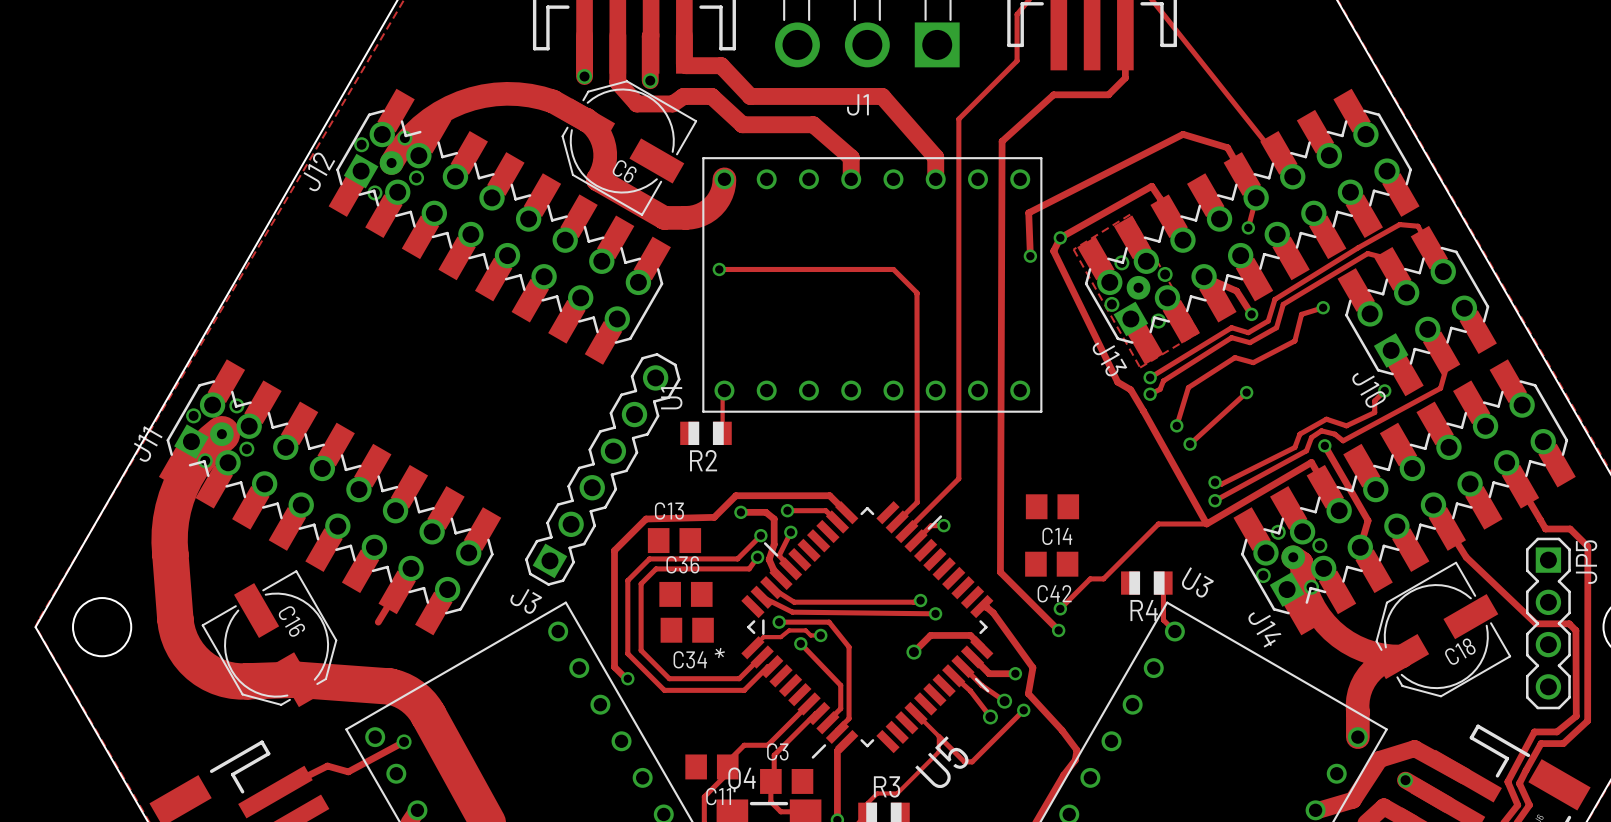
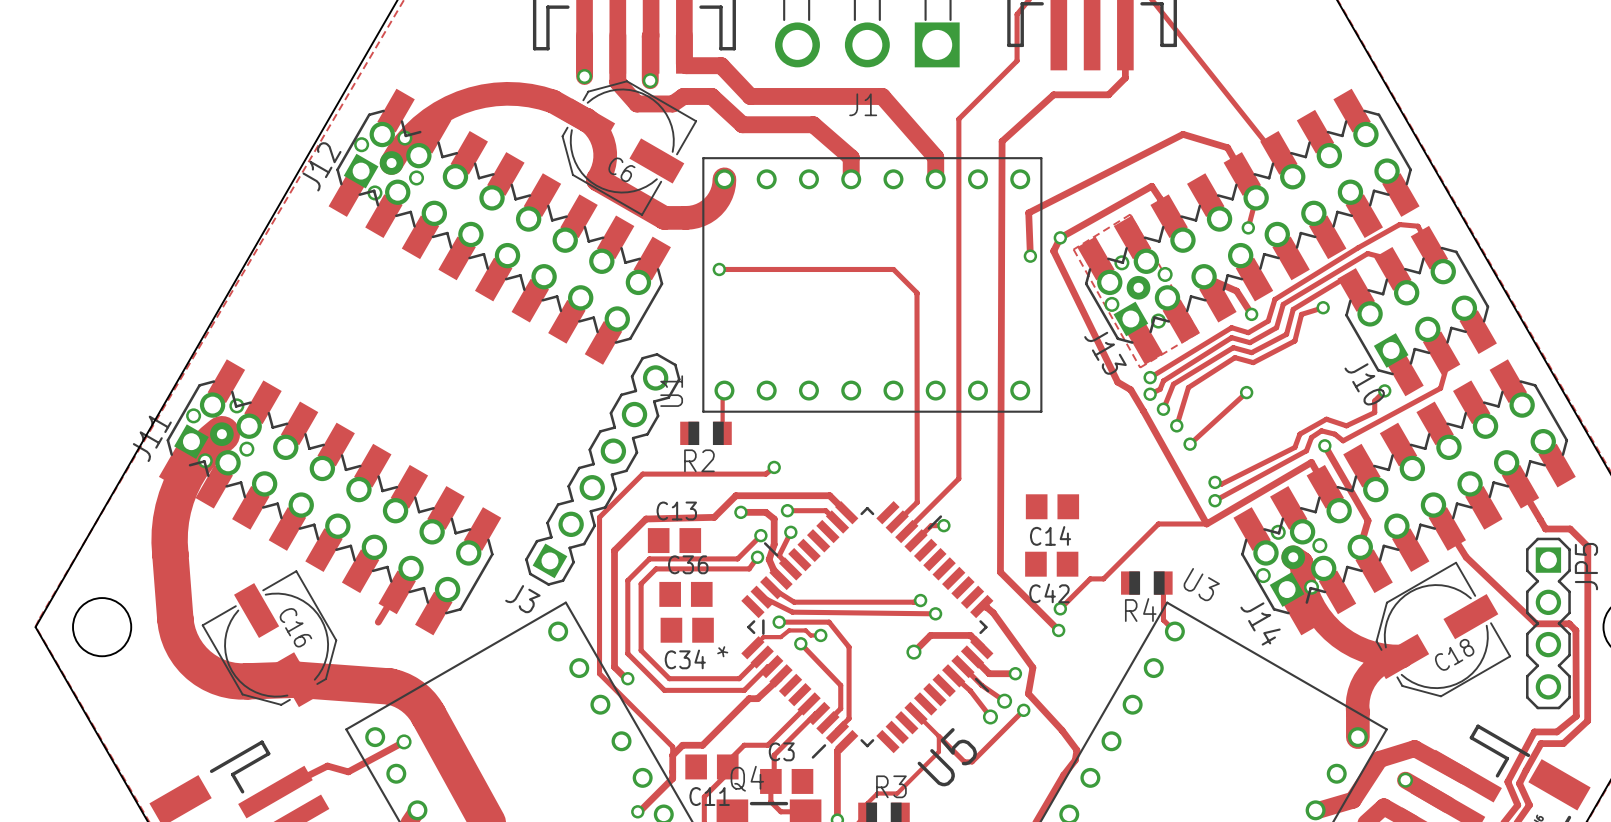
track: none -> (1370, 313) (1348, 276) (1293, 309) (1286, 334) (1251, 352) (1233, 347) (1173, 384) (1163, 409)
via: none -> (1163, 409)
track: none -> (774, 467) (765, 474) (642, 474) (599, 517) (599, 673) (672, 746) (672, 771)
via: none -> (774, 467)
track: none -> (781, 675) (757, 698) (749, 698) (702, 745) (682, 745) (672, 755) (672, 778) (637, 811)
via: none -> (637, 811)

